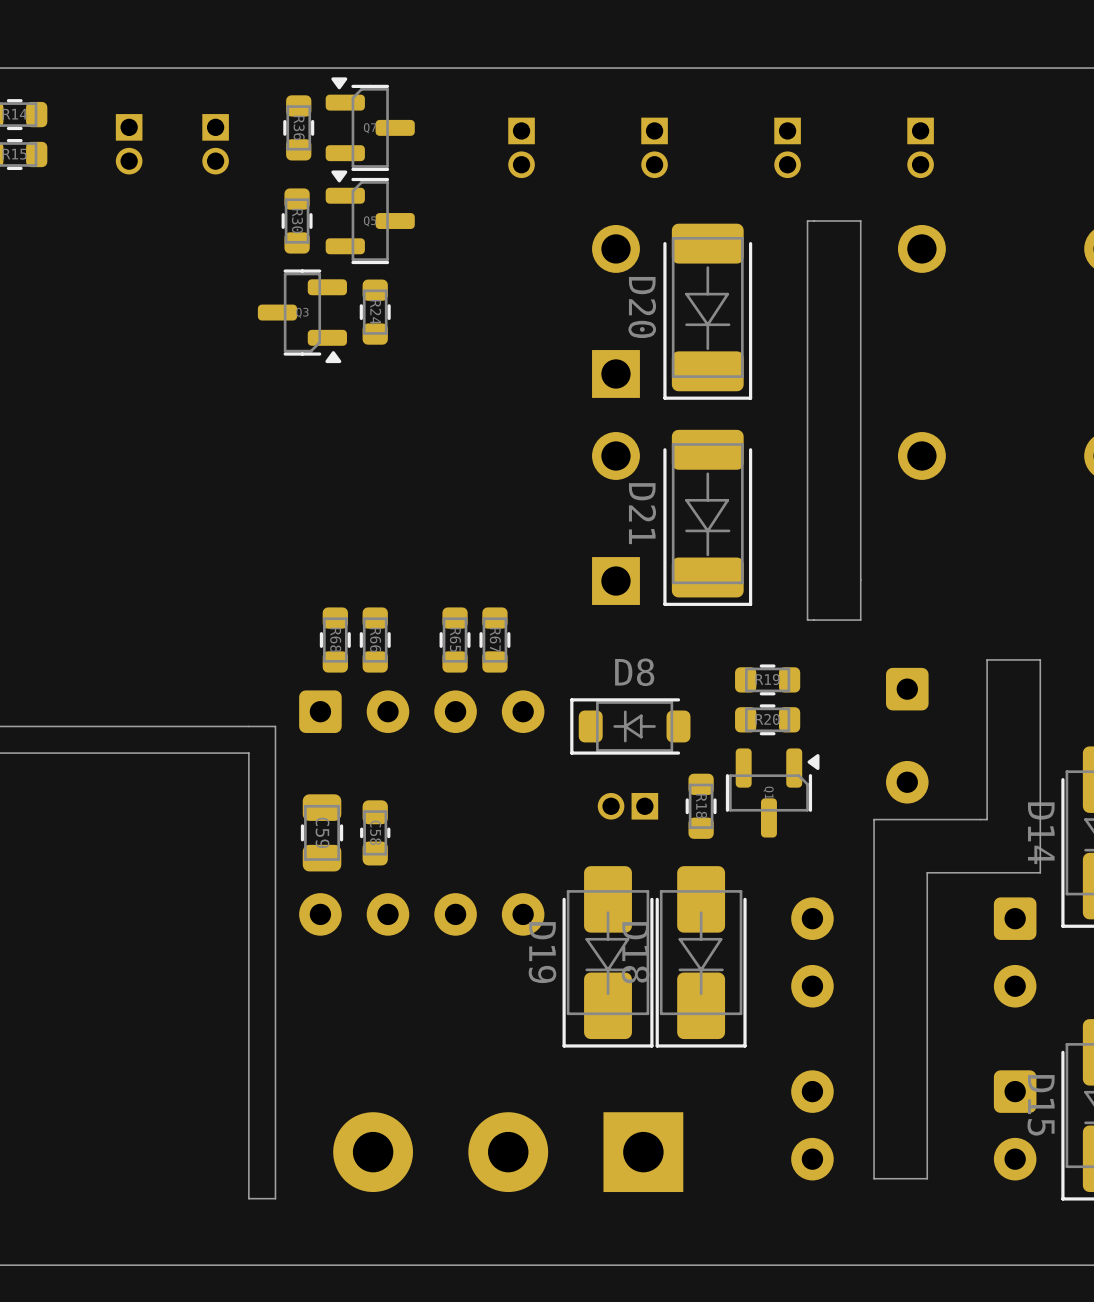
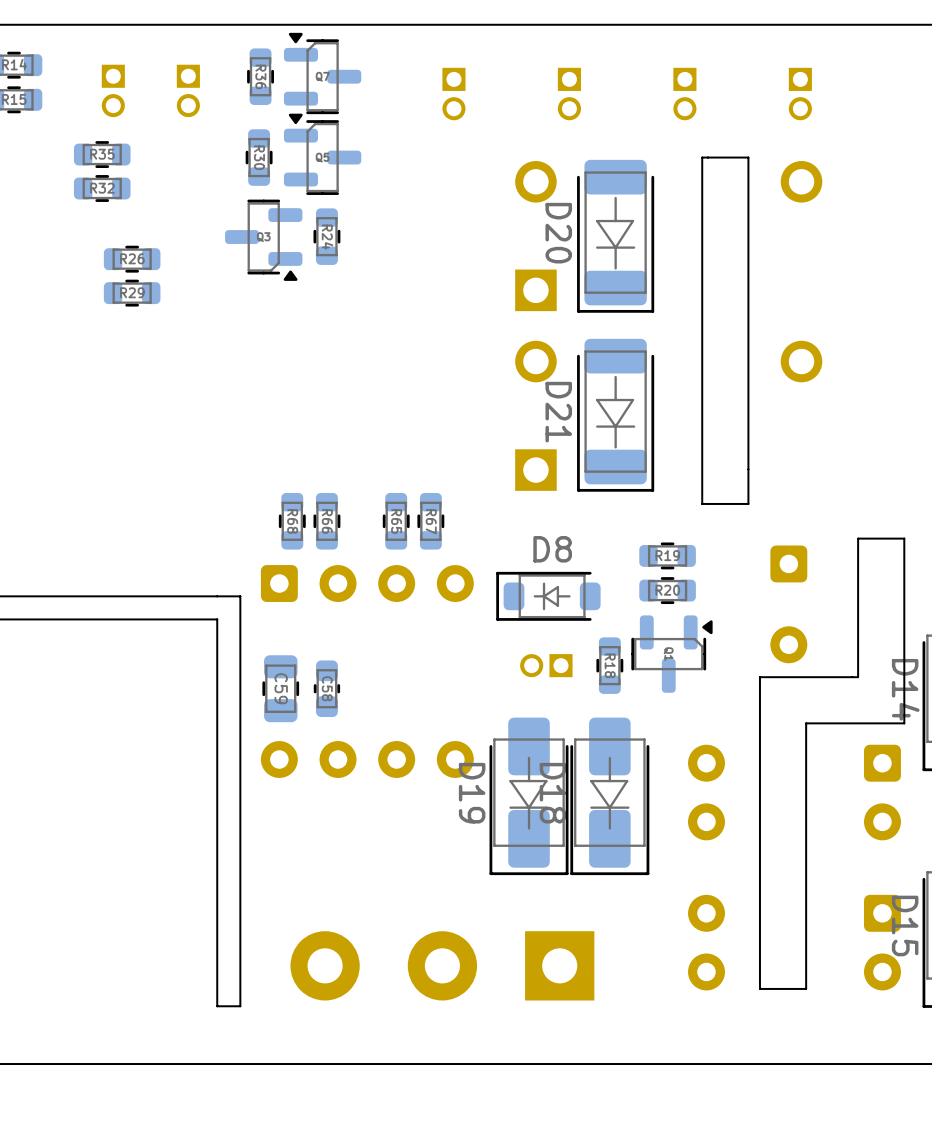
R35: none -> (102, 154)
R32: none -> (102, 188)
R26: none -> (132, 259)
R29: none -> (132, 293)

